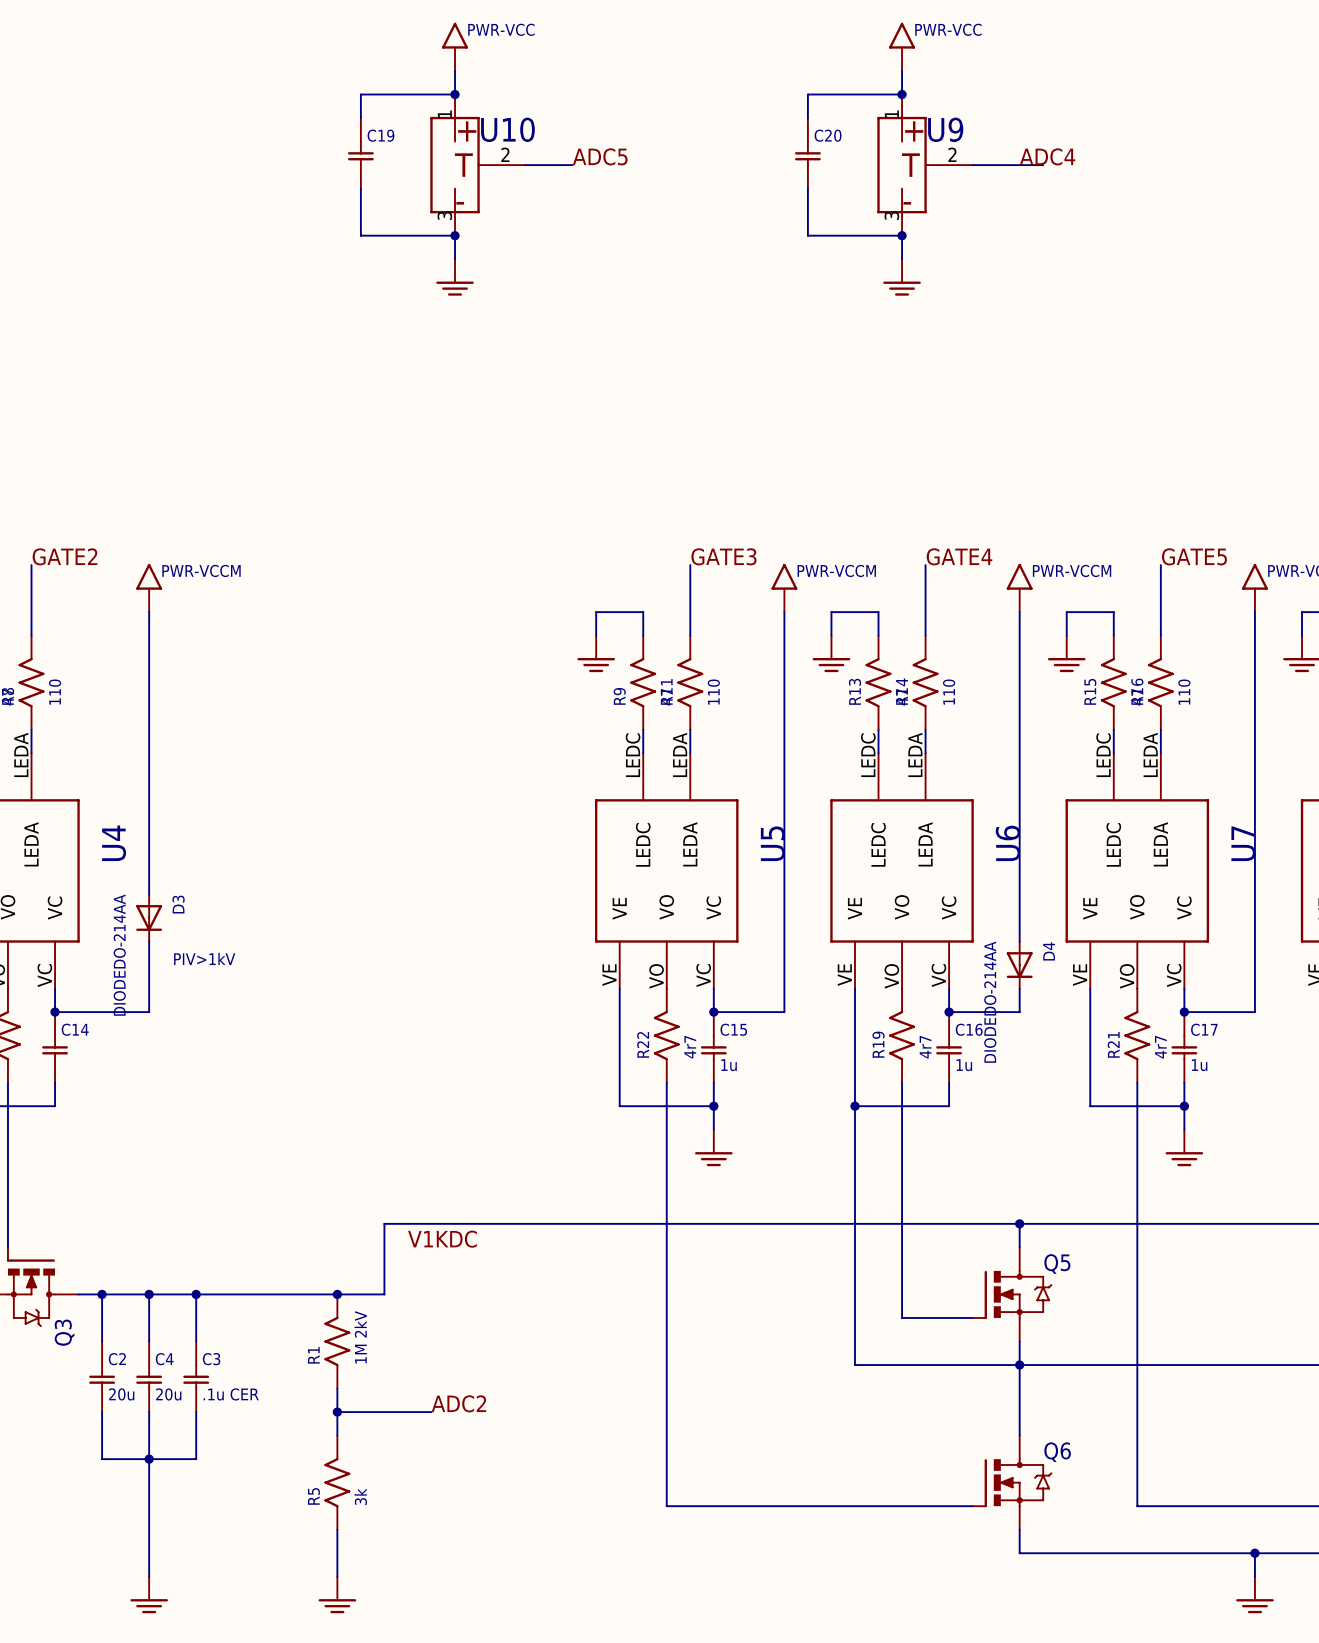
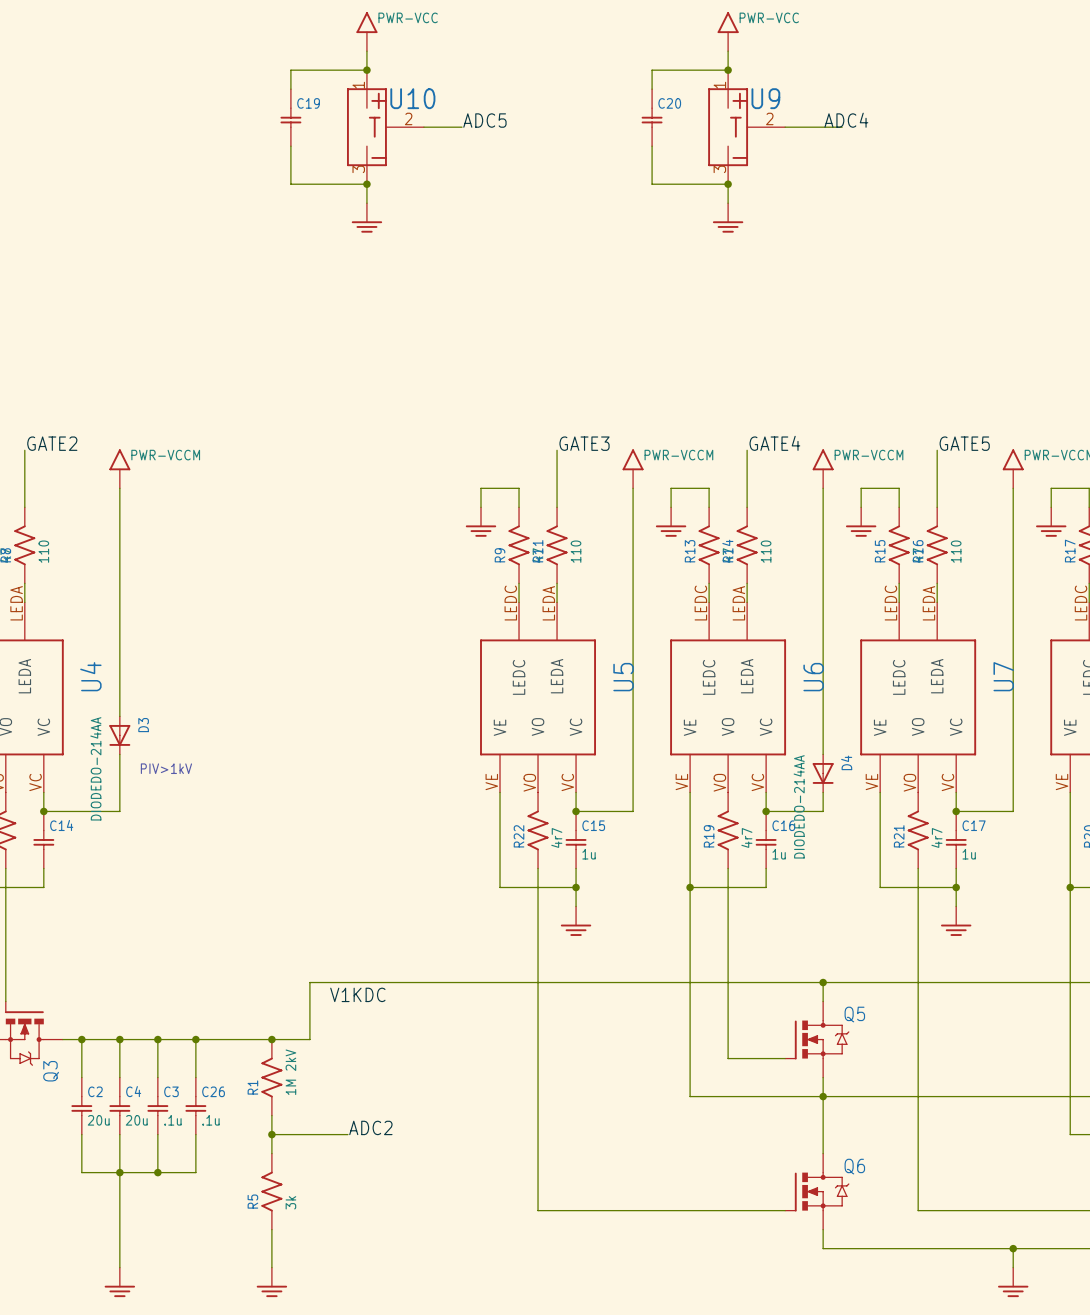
wire: none -> (195, 1039) (195, 1077)
junction: none -> (195, 1039)
C26: none -> .1u (195, 1106)
C3 value: .1u CER (231, 1394) -> .1u (172, 1120)
wire: none -> (195, 1134) (195, 1172) (157, 1172)
junction: none -> (157, 1172)

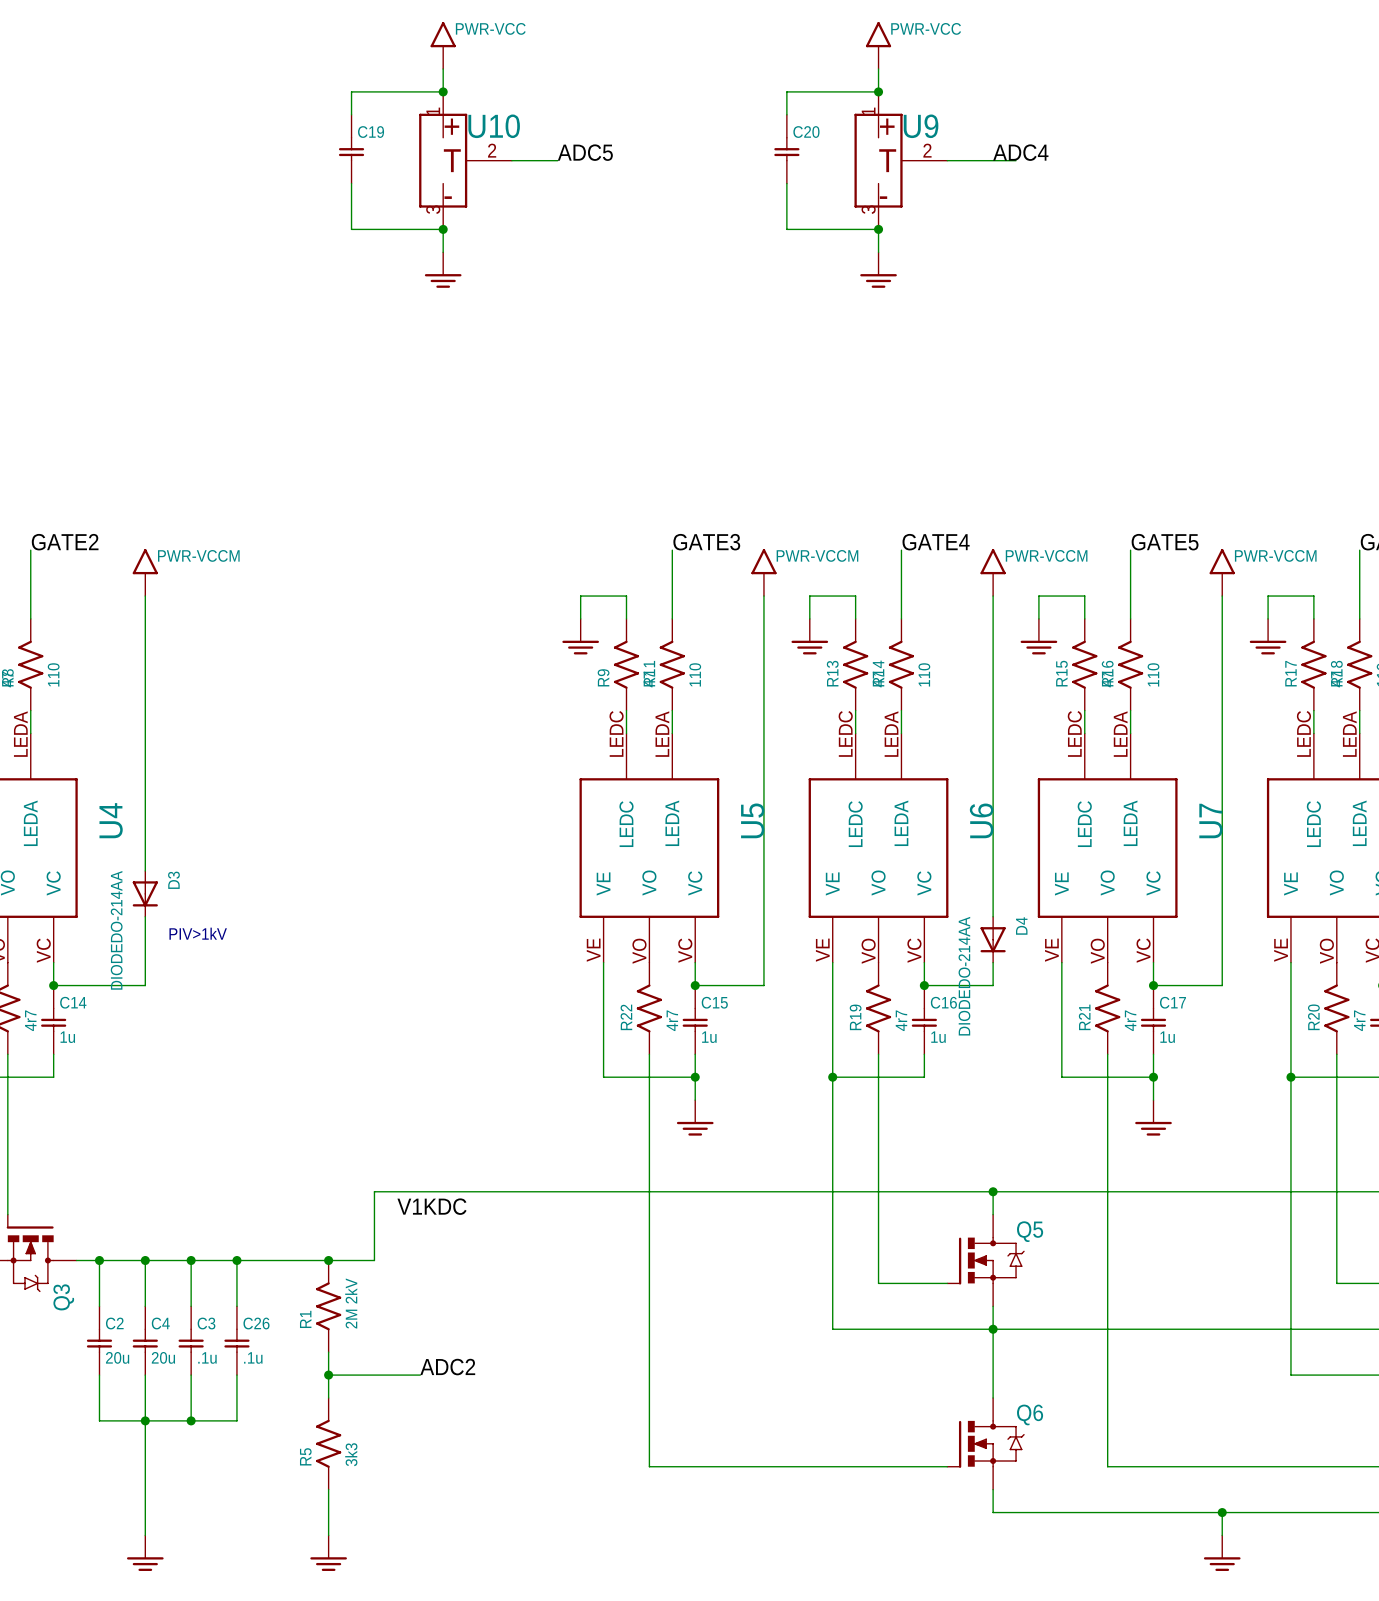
part value: none -> 4r7 (30, 1020)
C14 value: none -> 1u (67, 1037)
R1 value: 1M 2kV (290, 1072) -> 2M 2kV (351, 1303)
R5 value: 3k (290, 1202) -> 3k3 (351, 1454)

